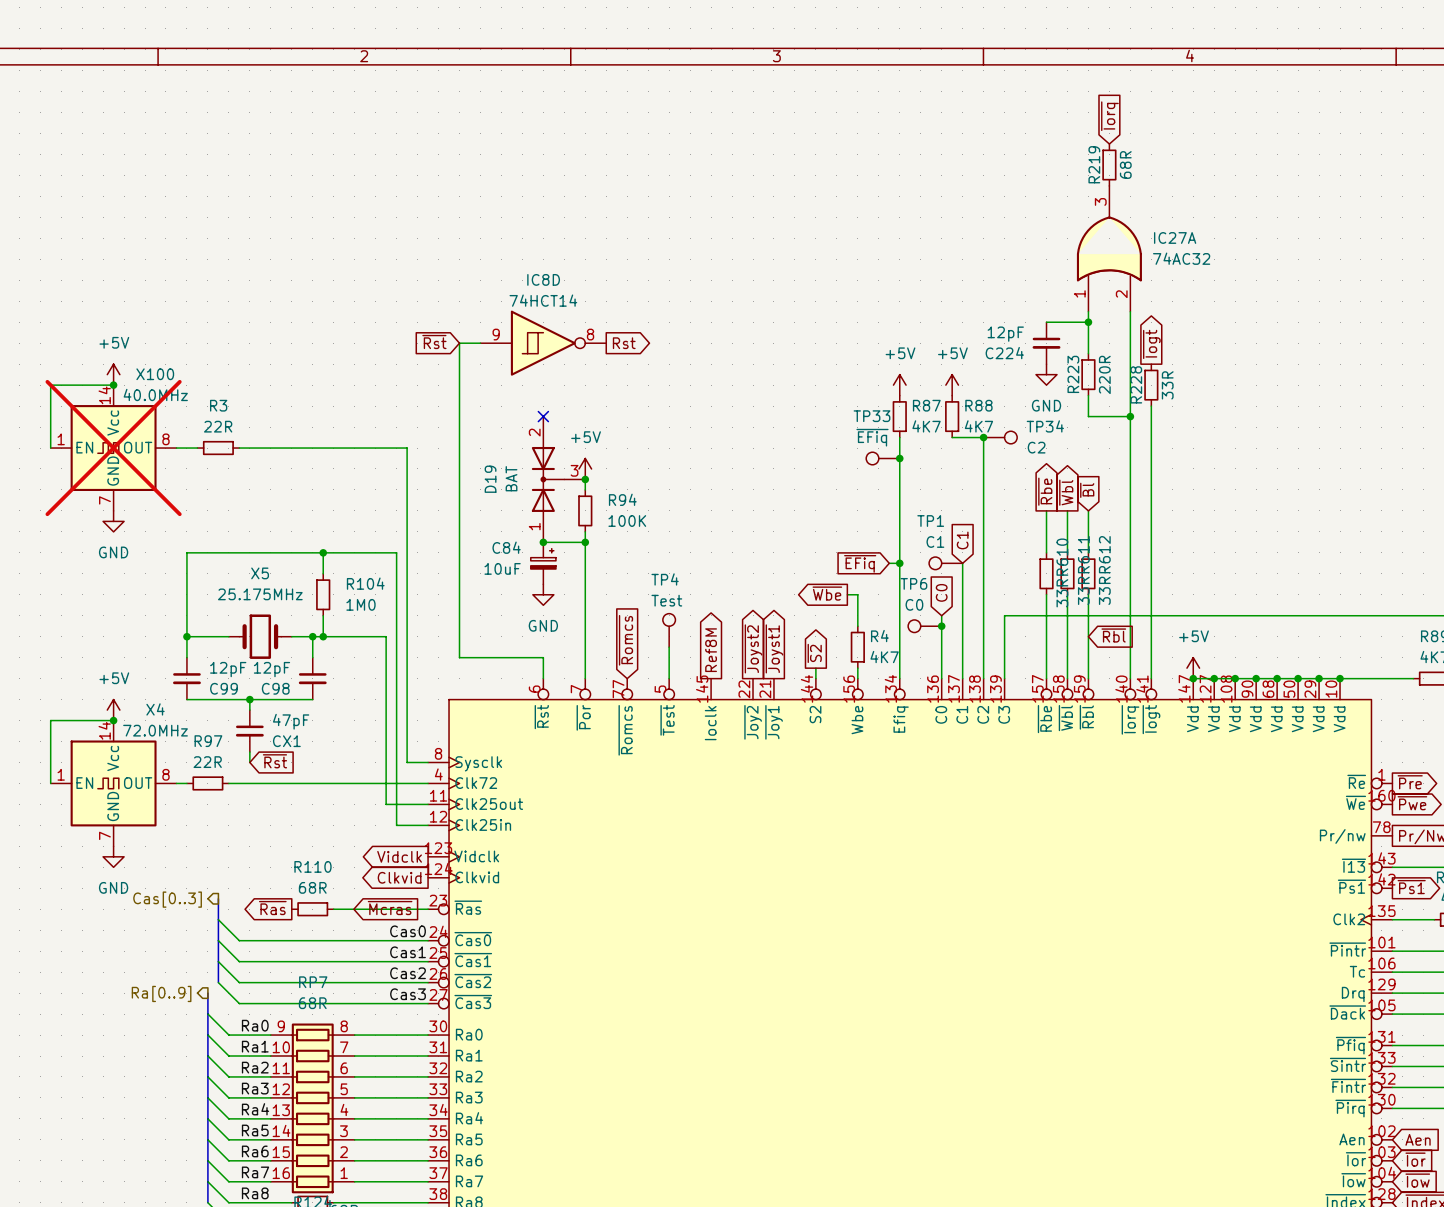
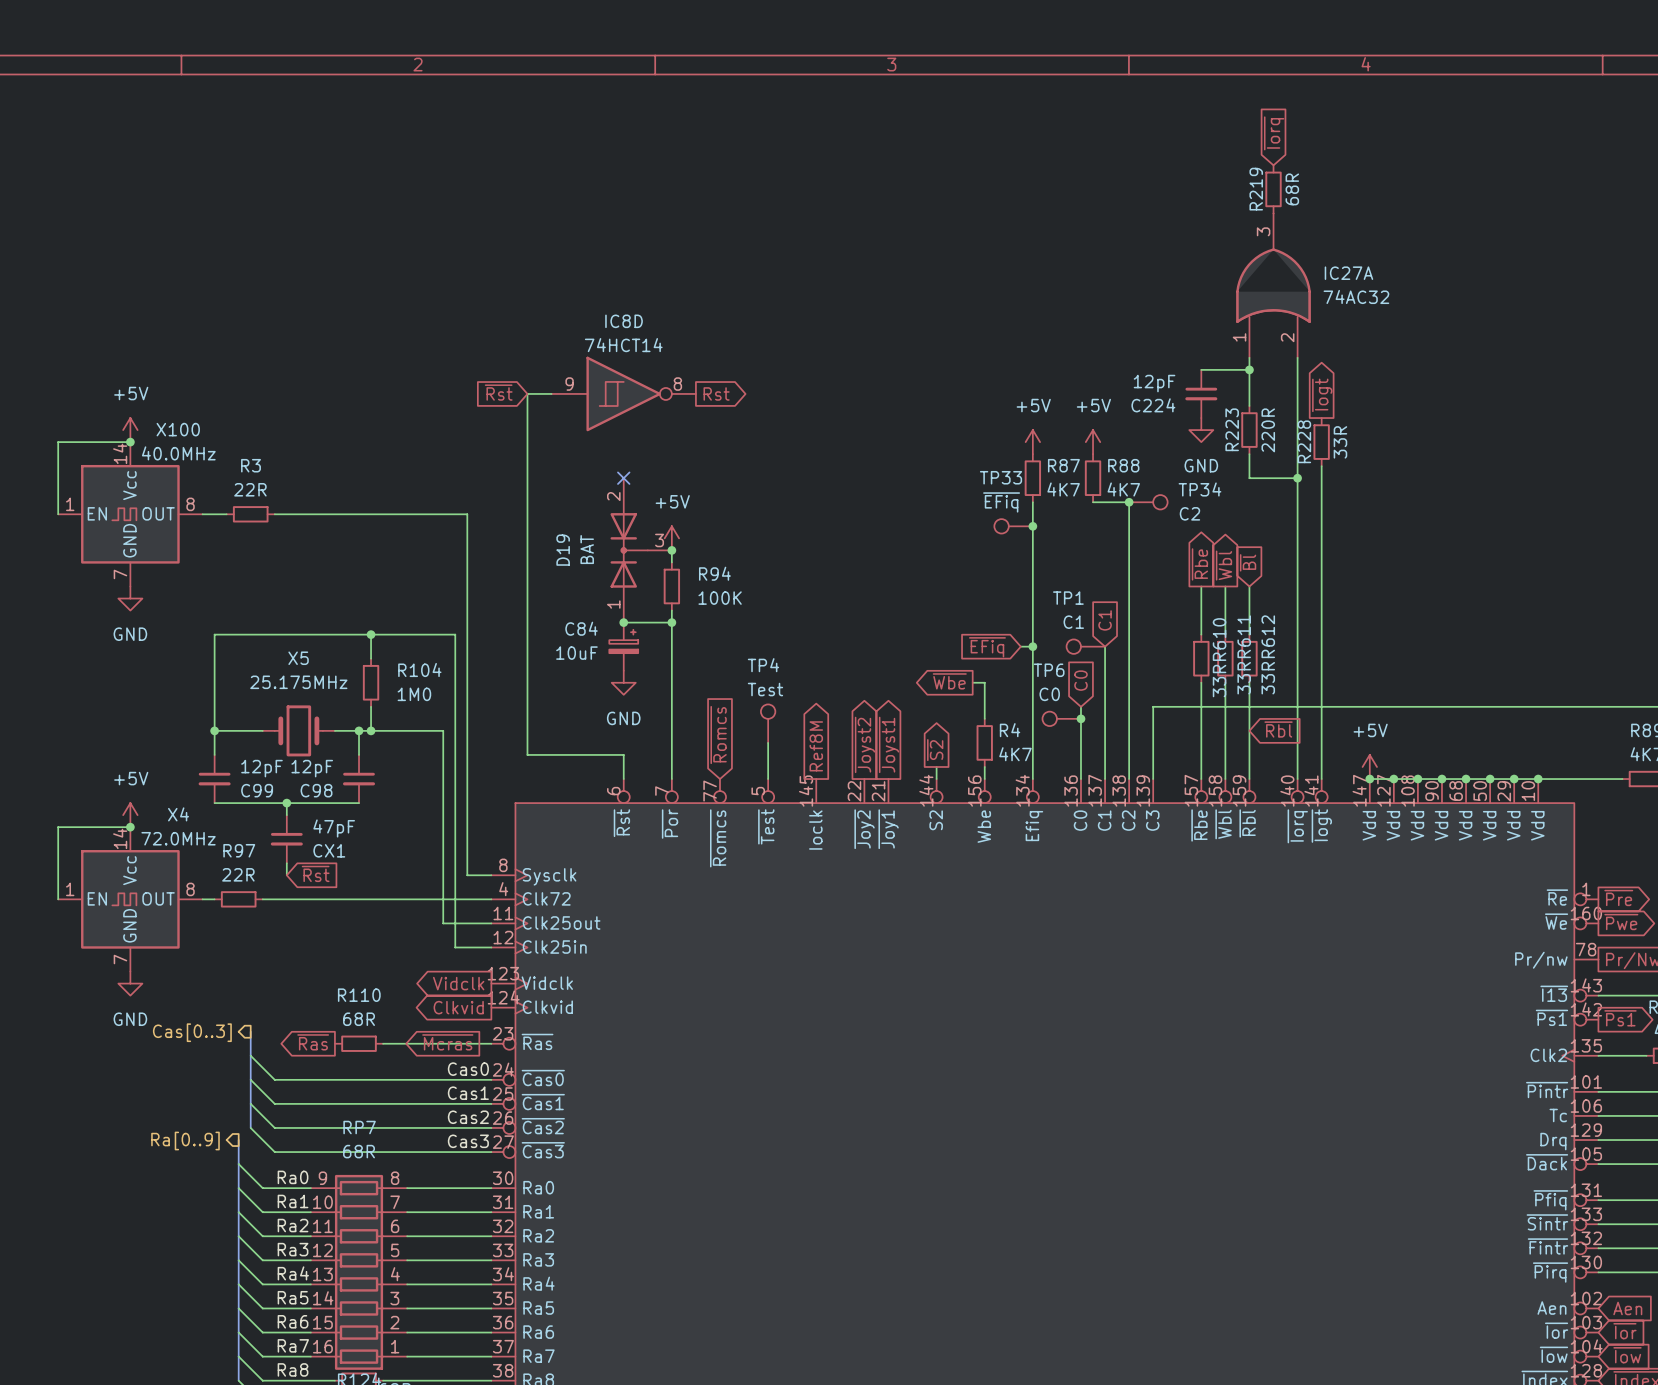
X100 do-not-place cross: (113, 448) -> none

